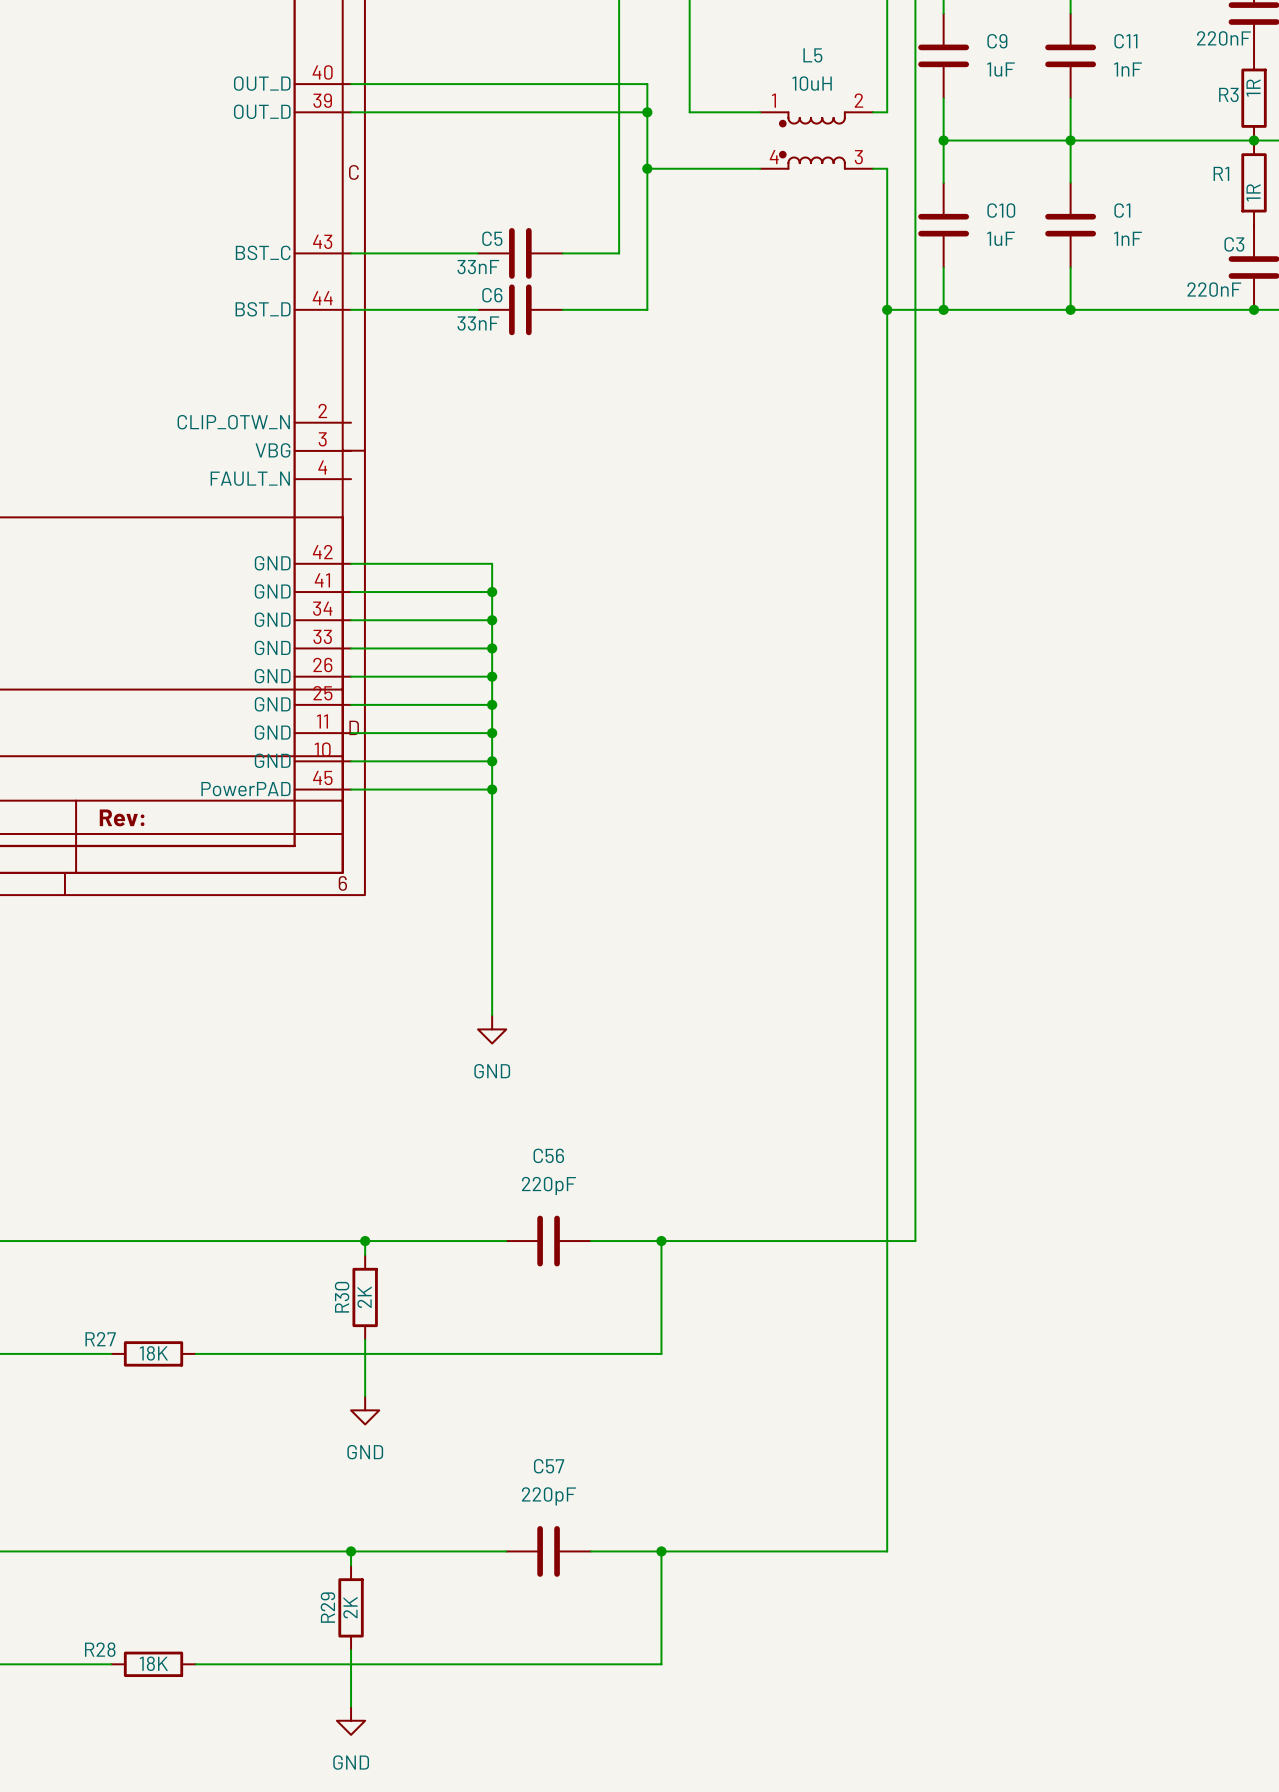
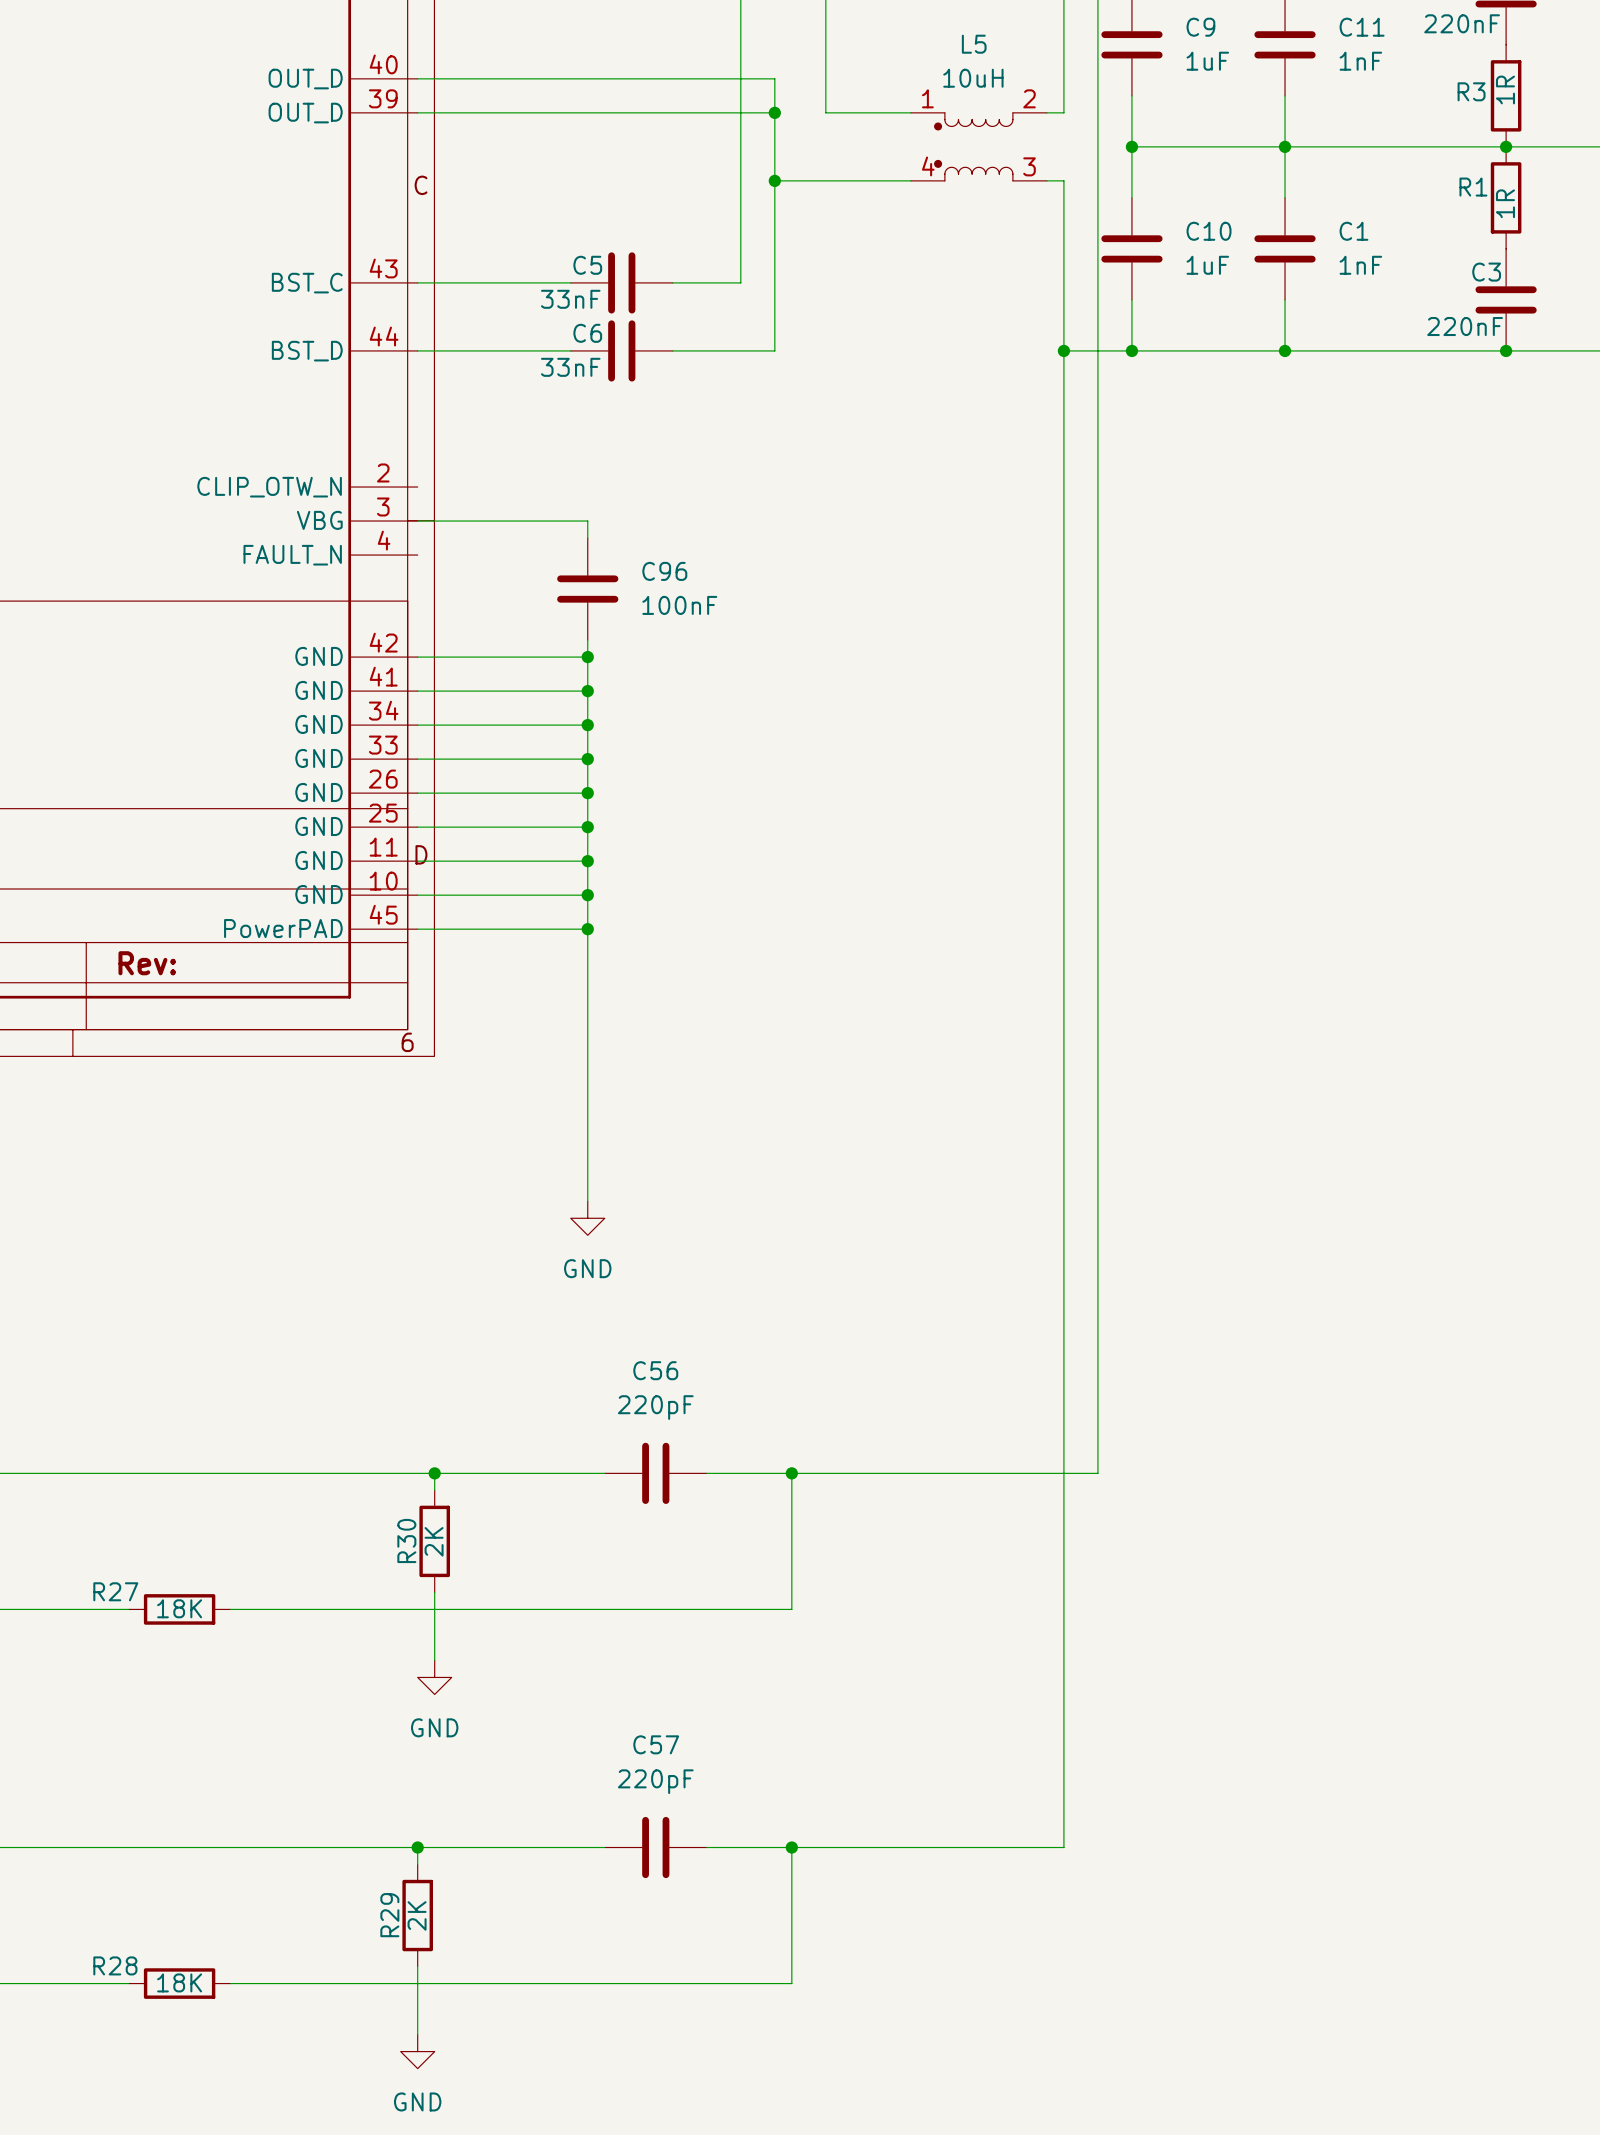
wire: none -> (417, 521) (587, 521) (587, 538)
C96: none -> 100nF (587, 589)
wire: none -> (587, 640) (587, 657)
junction: none -> (587, 657)

